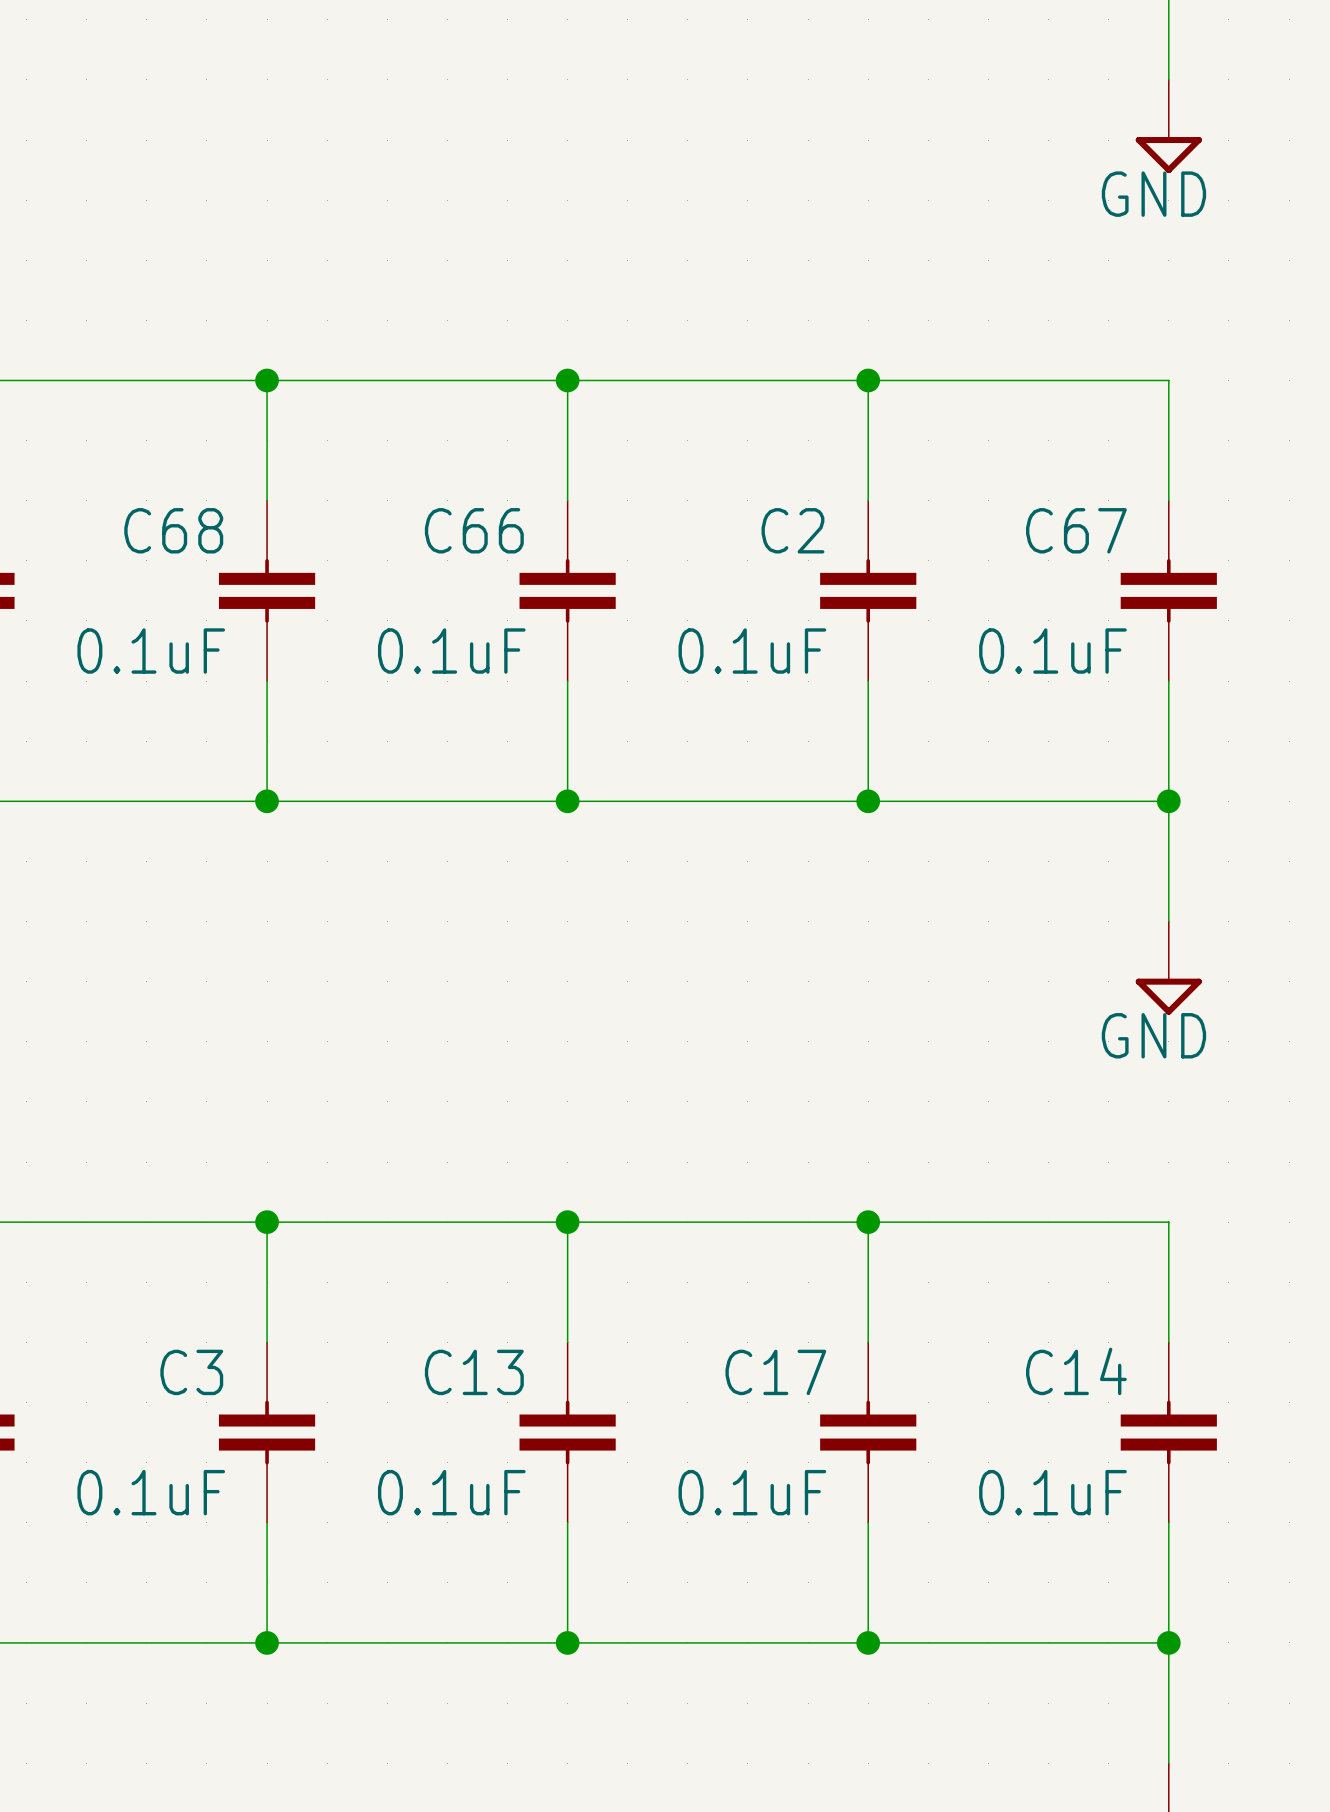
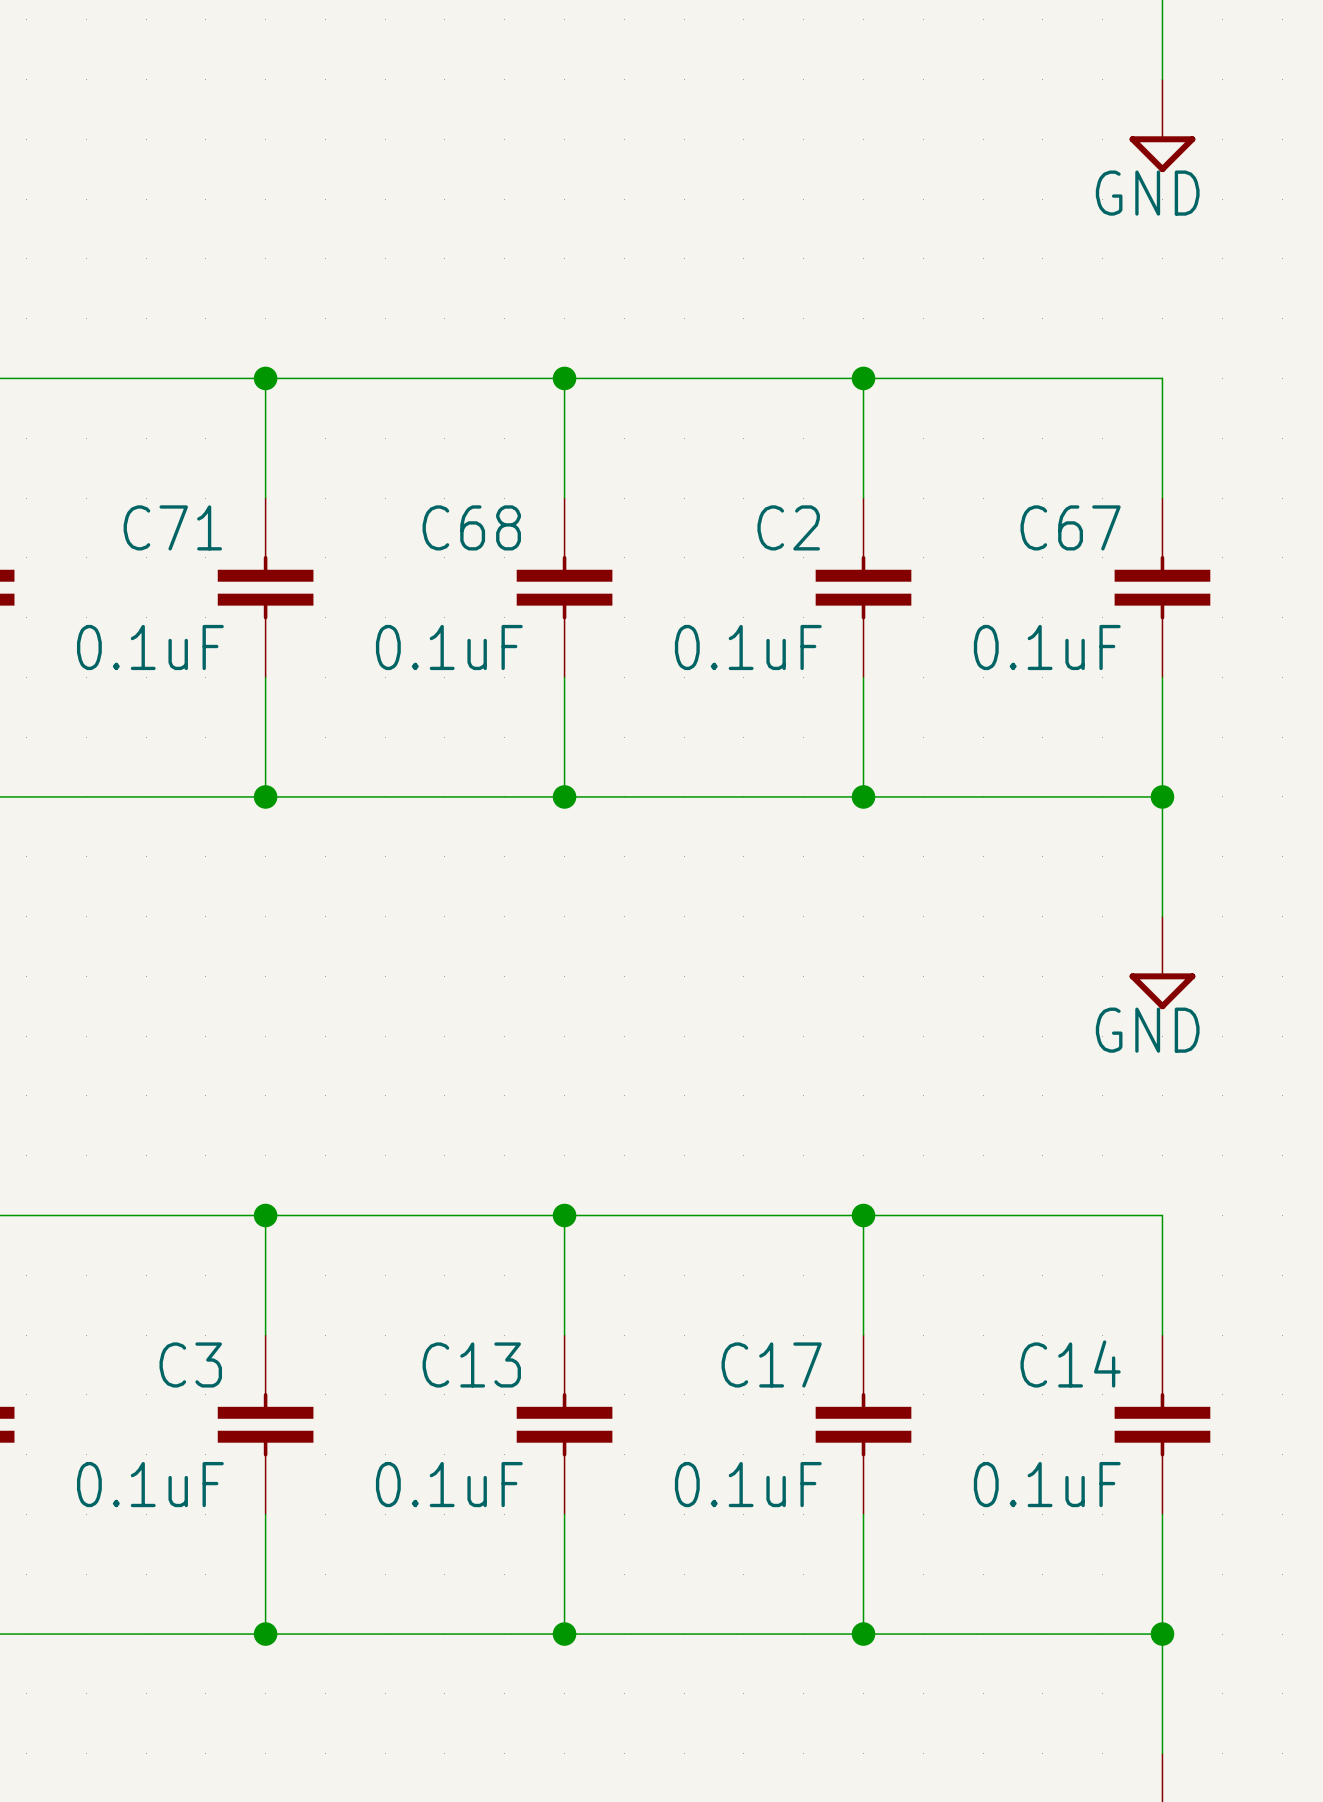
C68 name: C68 (173, 530) -> C71 (172, 527)
C66 name: C66 (474, 530) -> C68 (471, 527)

